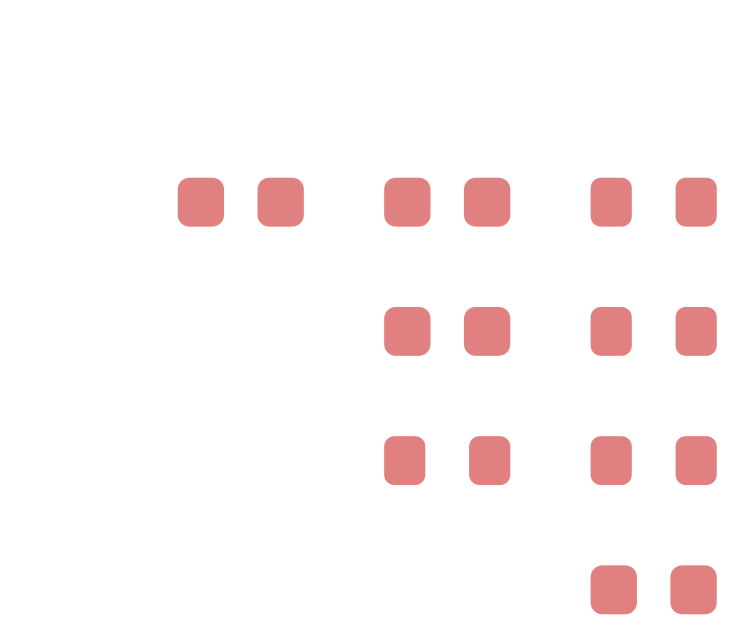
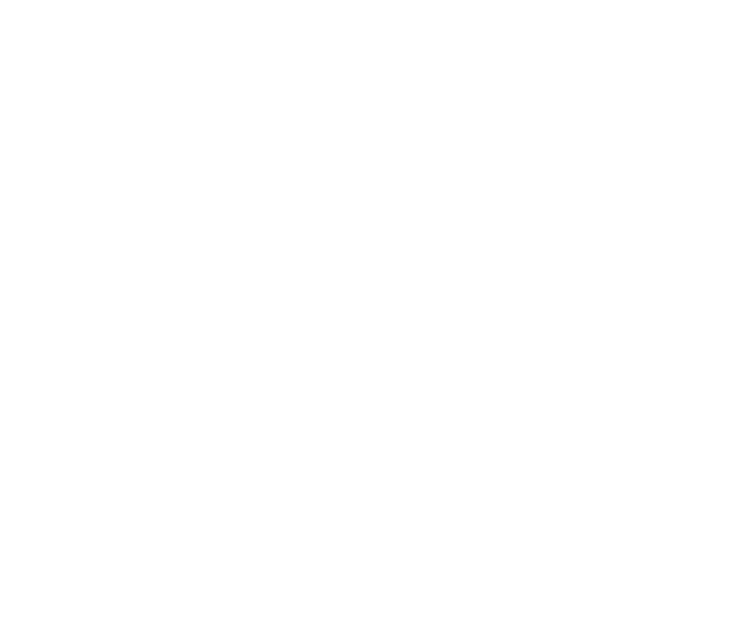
part: (240, 202) -> none
part: (447, 202) -> none
part: (653, 202) -> none
part: (447, 331) -> none
part: (653, 331) -> none
part: (447, 460) -> none
part: (653, 460) -> none
part: (653, 589) -> none

